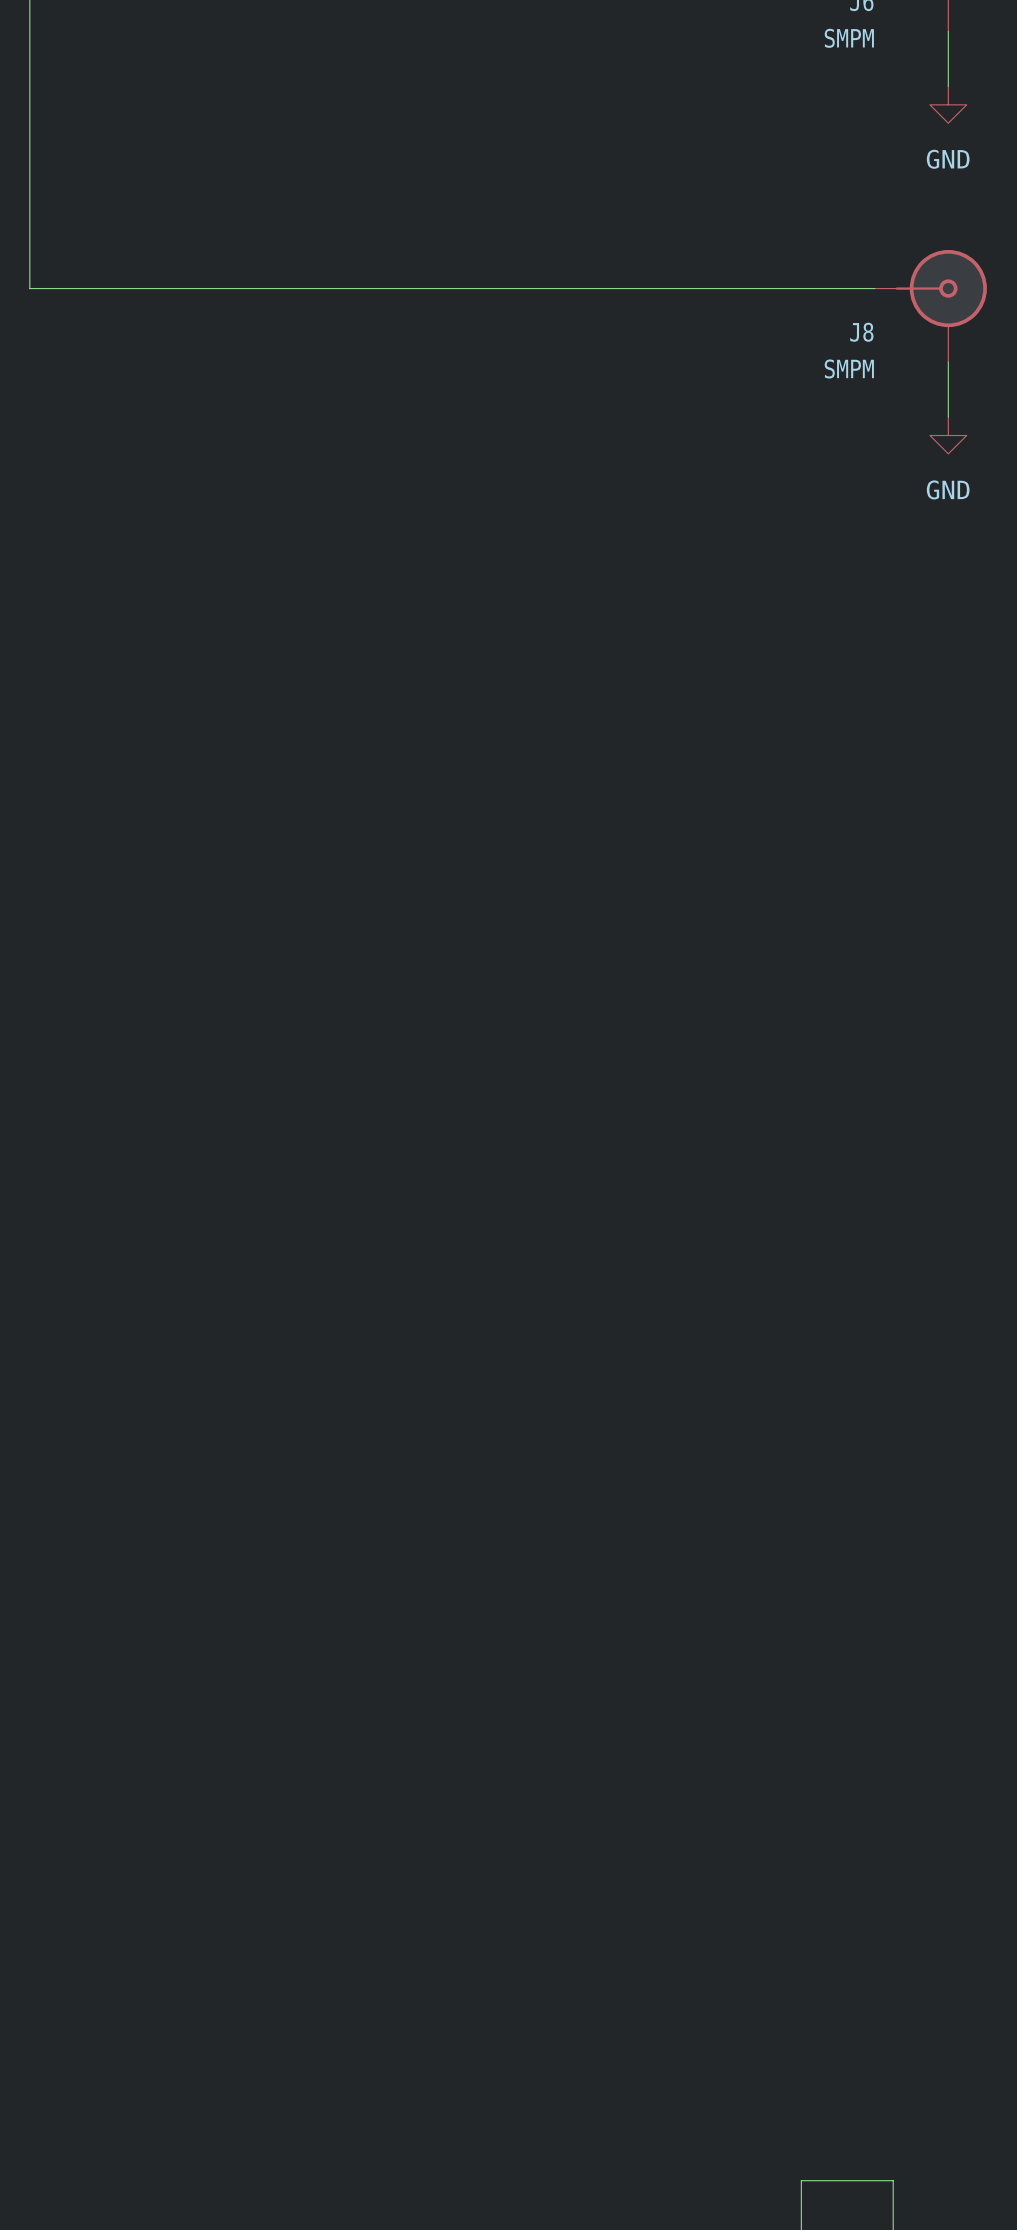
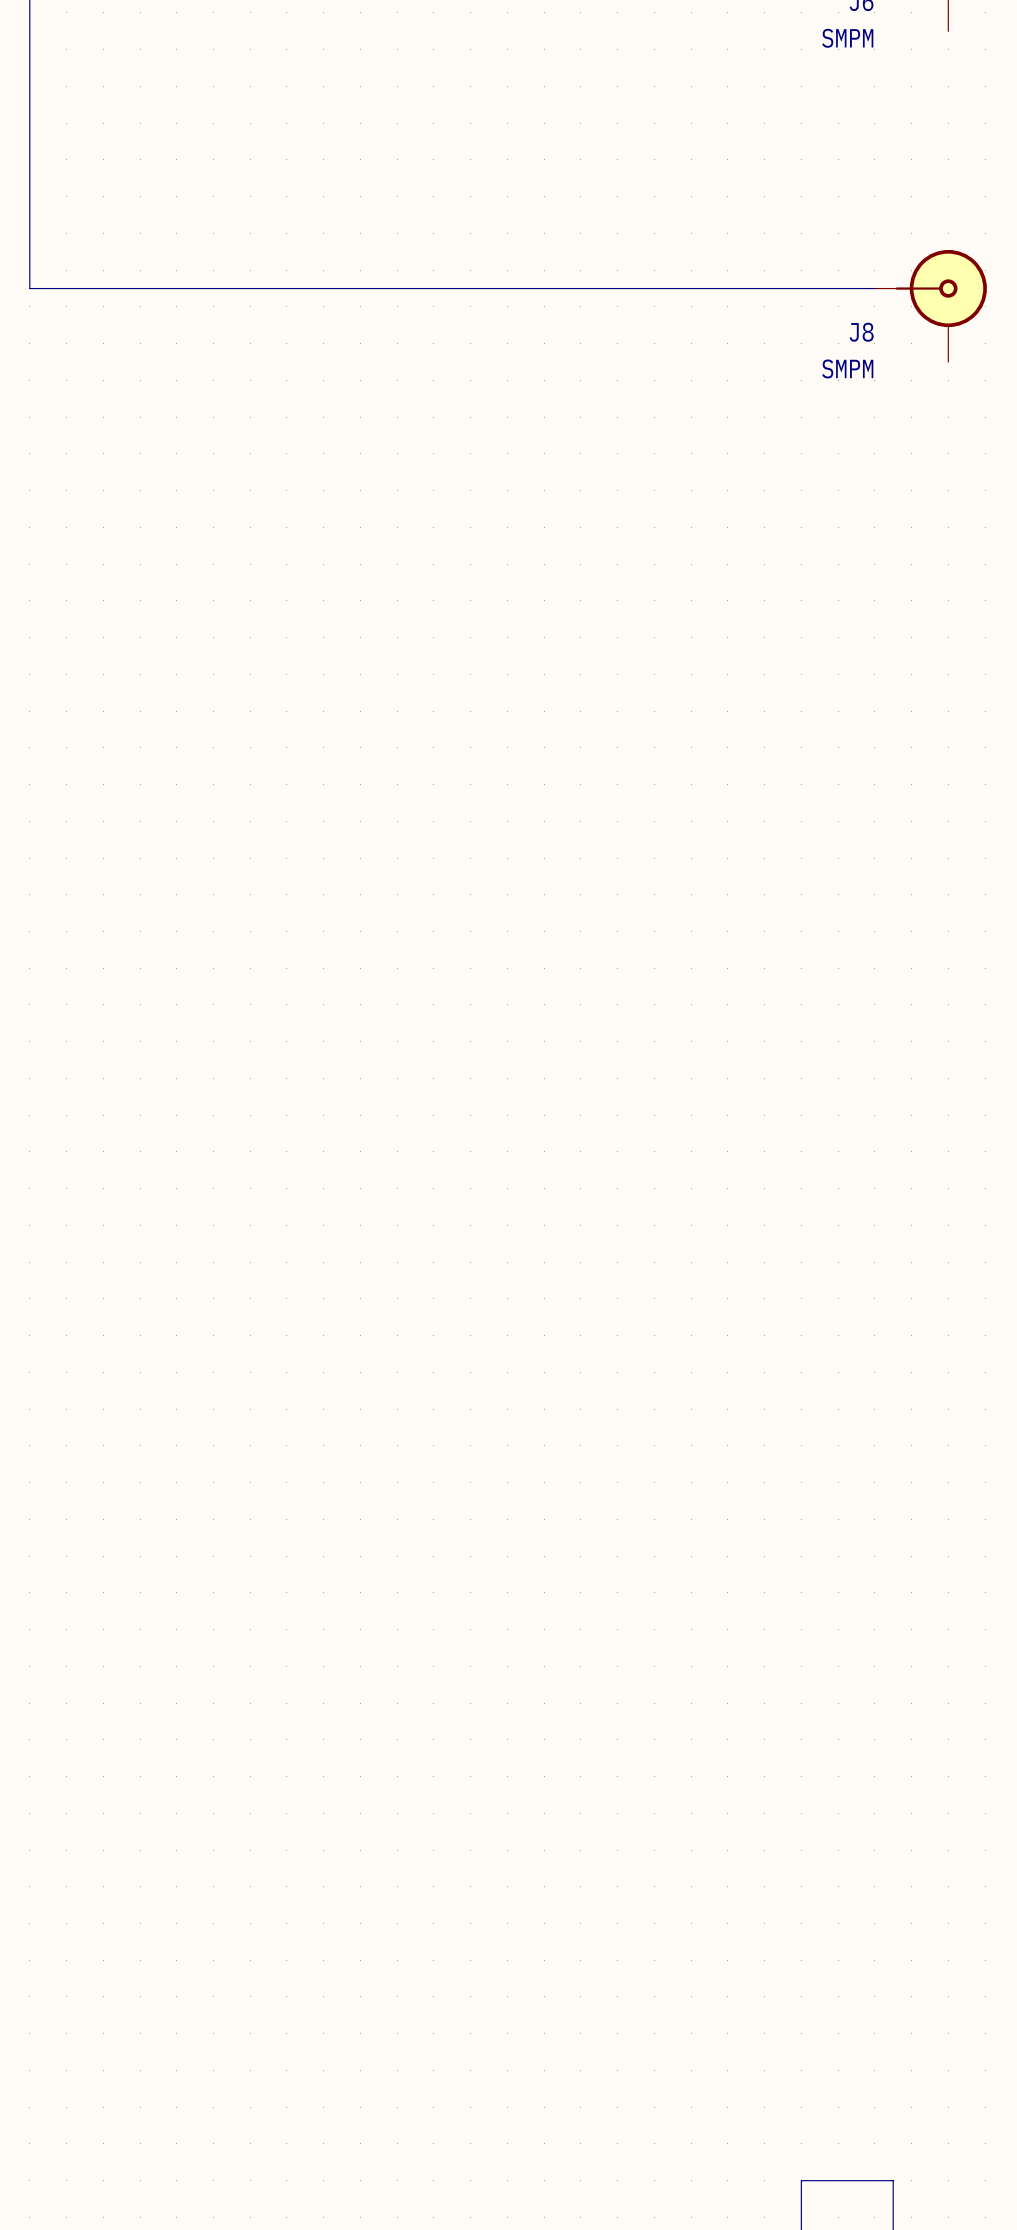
wire: (948, 31) (948, 86) -> none
power symbol: GND (948, 104) -> none
wire: (948, 362) (948, 417) -> none
power symbol: GND (948, 435) -> none

